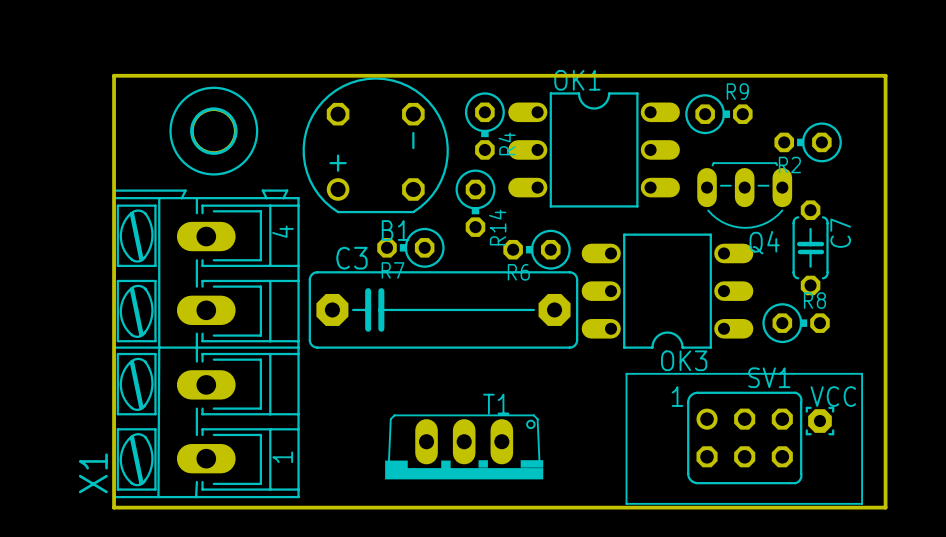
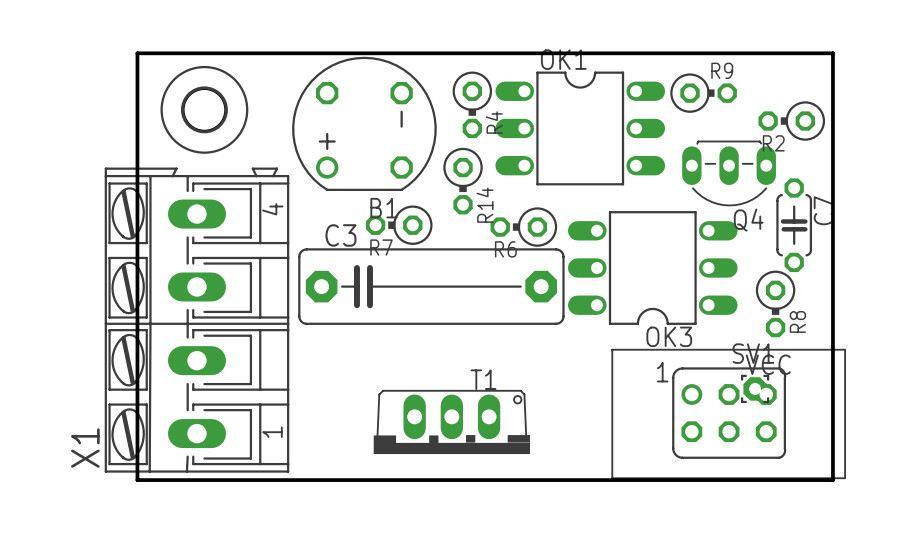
board edge: (114, 75) (885, 75) (885, 507) (114, 507) (114, 75) -> (137, 53) (137, 480) (832, 480) (832, 53) (137, 53)
R8 rotation: 0° (796, 323) -> 90° clockwise (775, 303)
VCC position: (819, 421) -> (755, 388)

